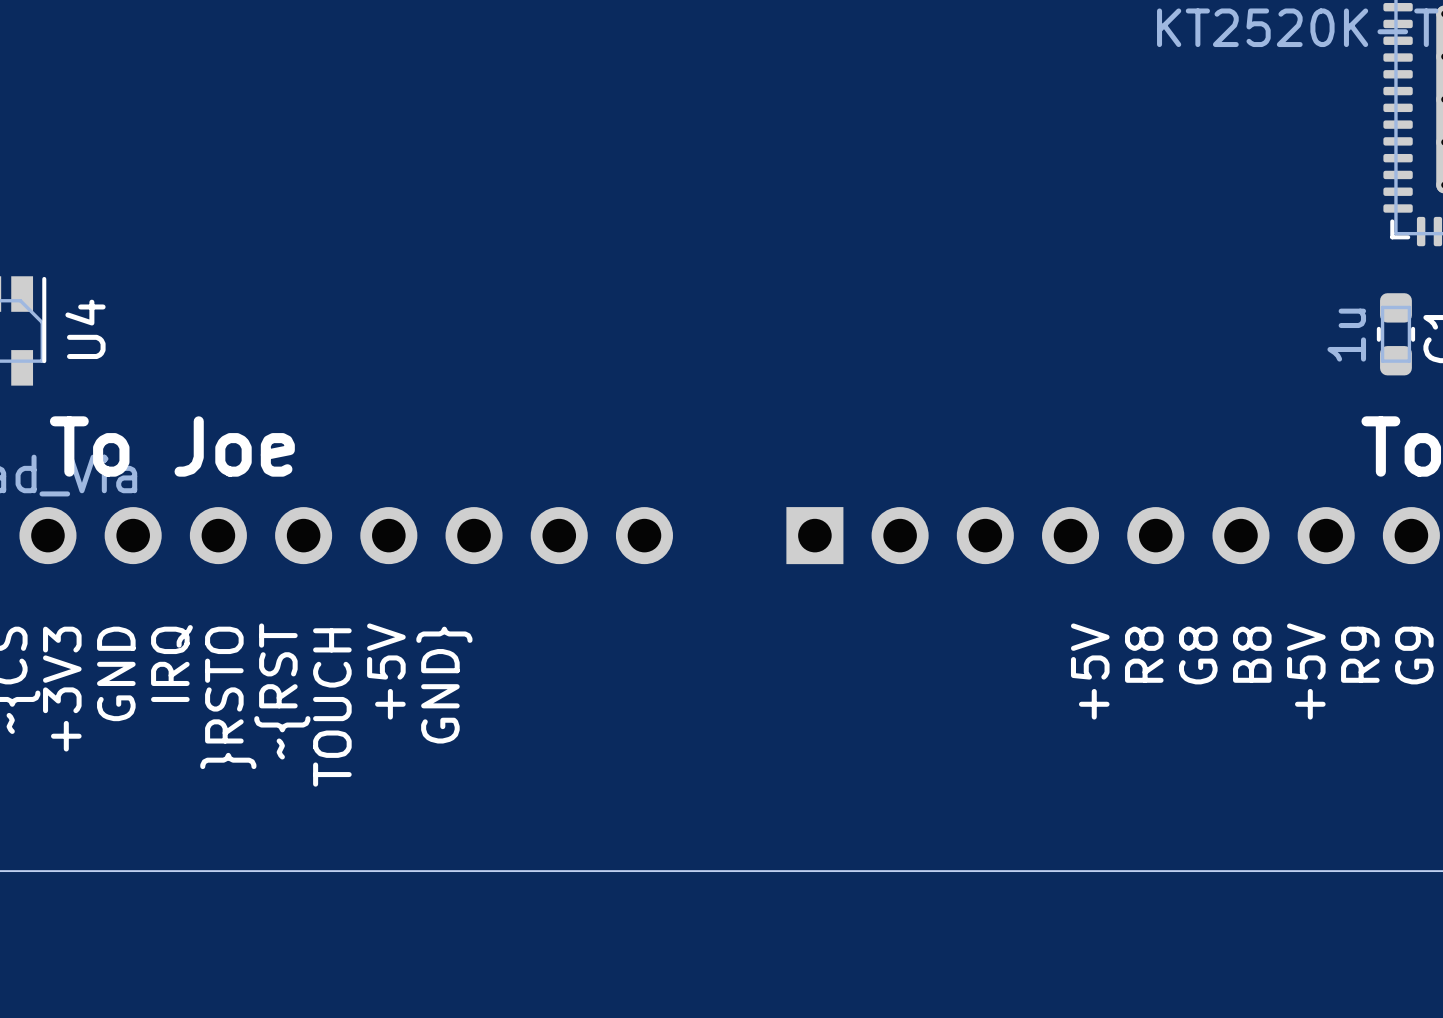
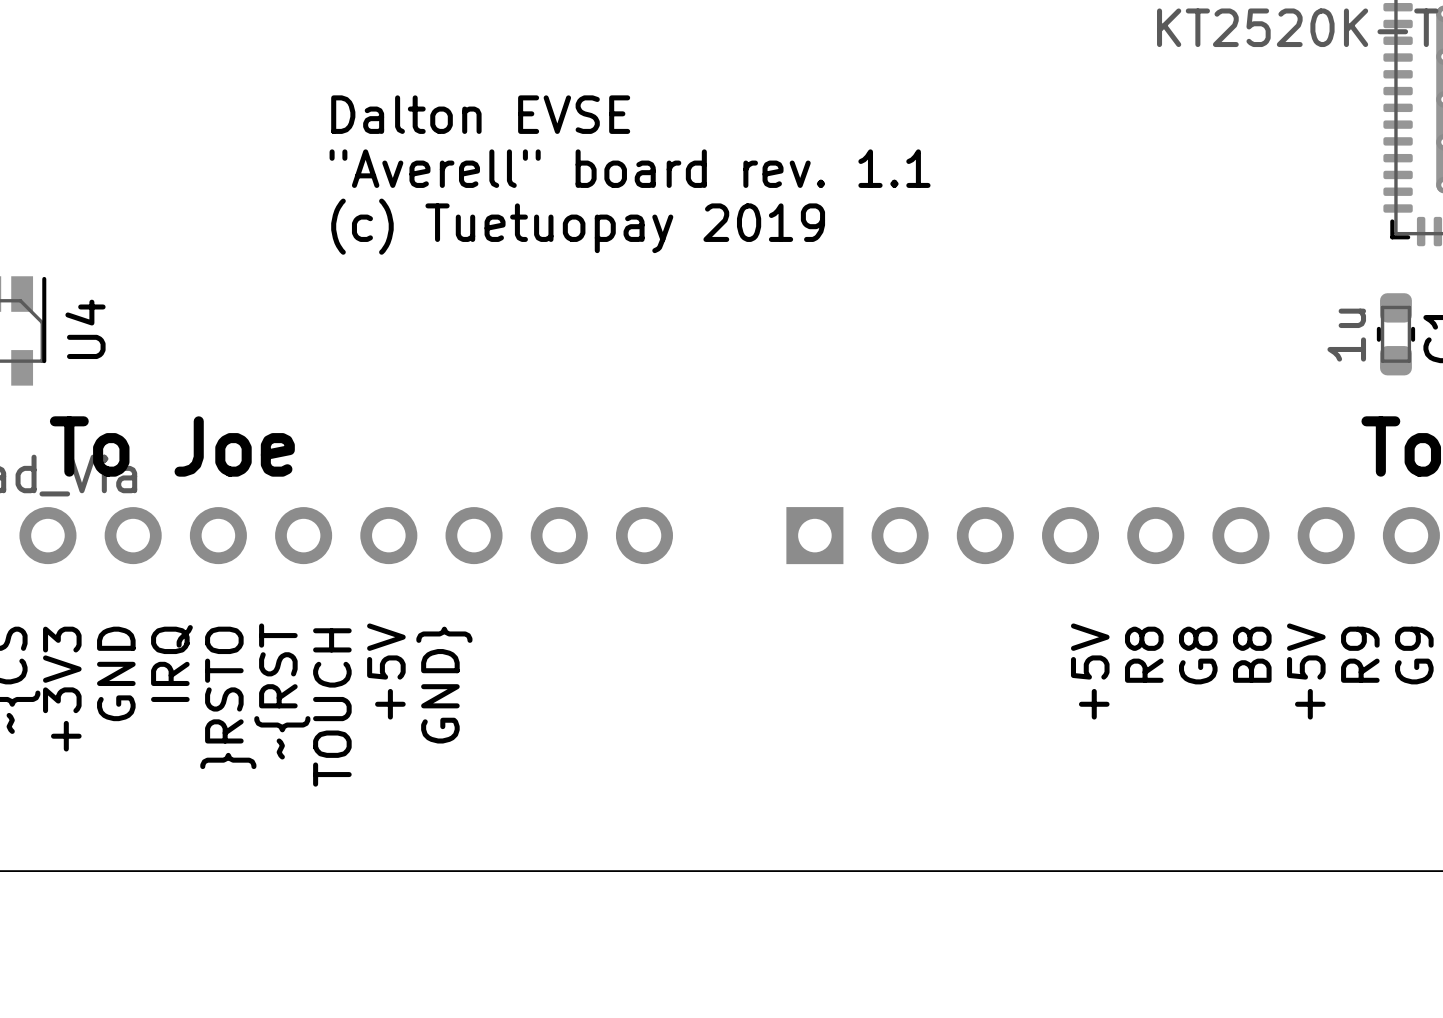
text: none -> Dalton EVSE (480, 114)
text: none -> "Averell" board rev. 1.1 (630, 168)
text: none -> (c) Tuetuopay 2019 (578, 226)

